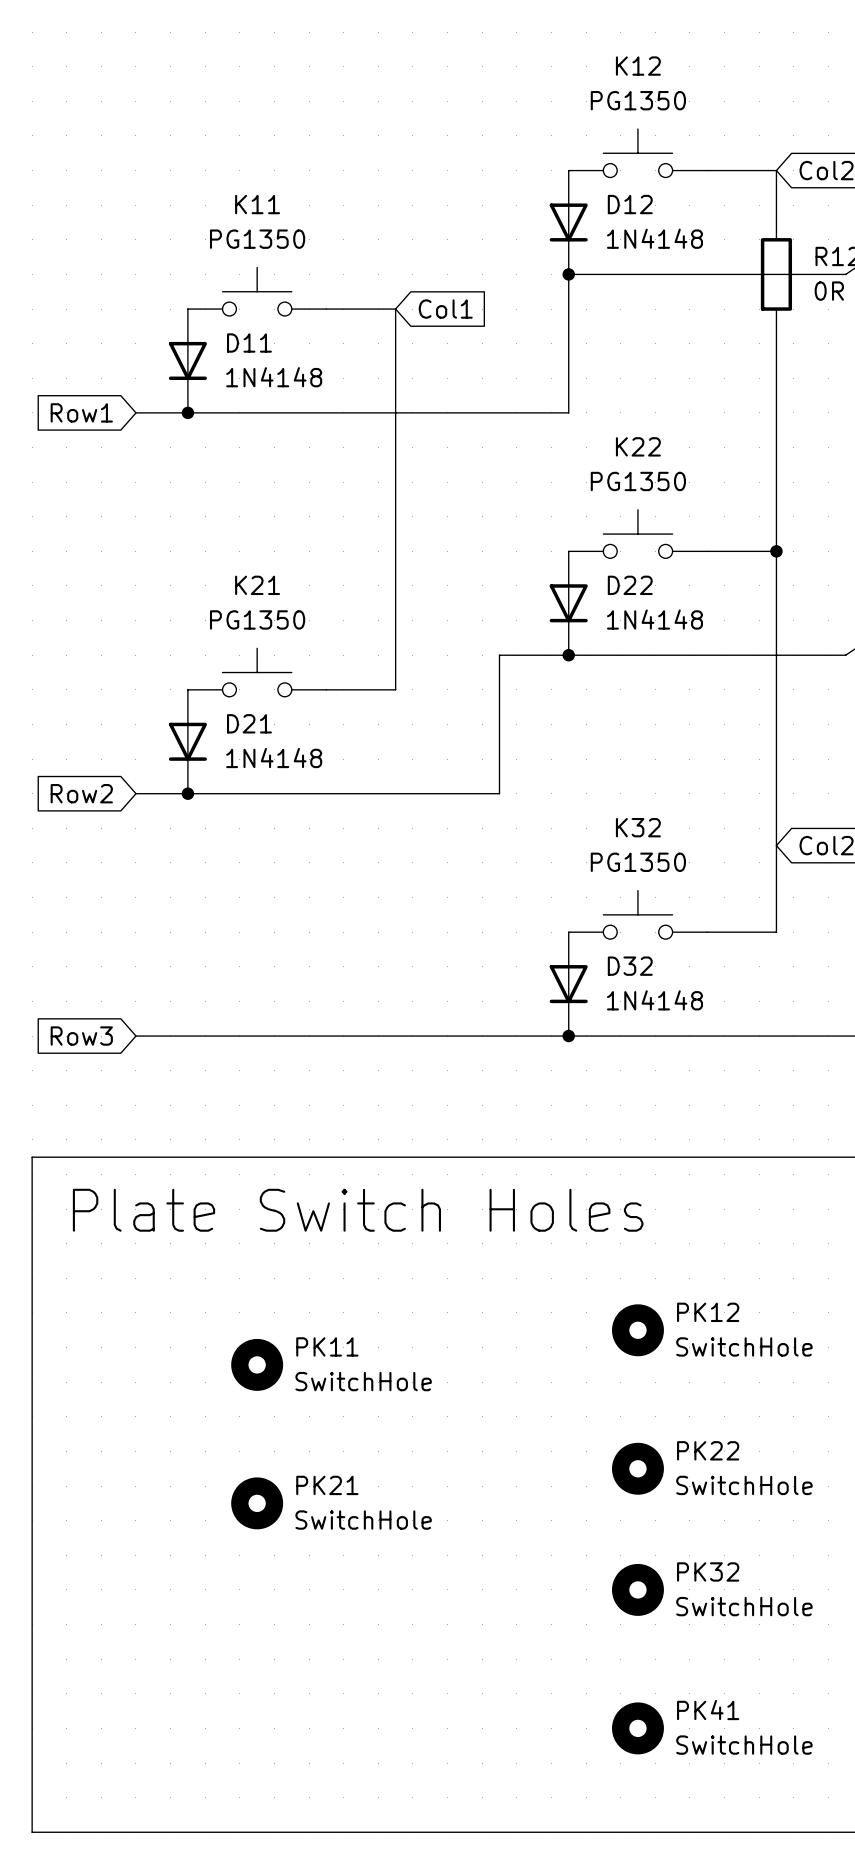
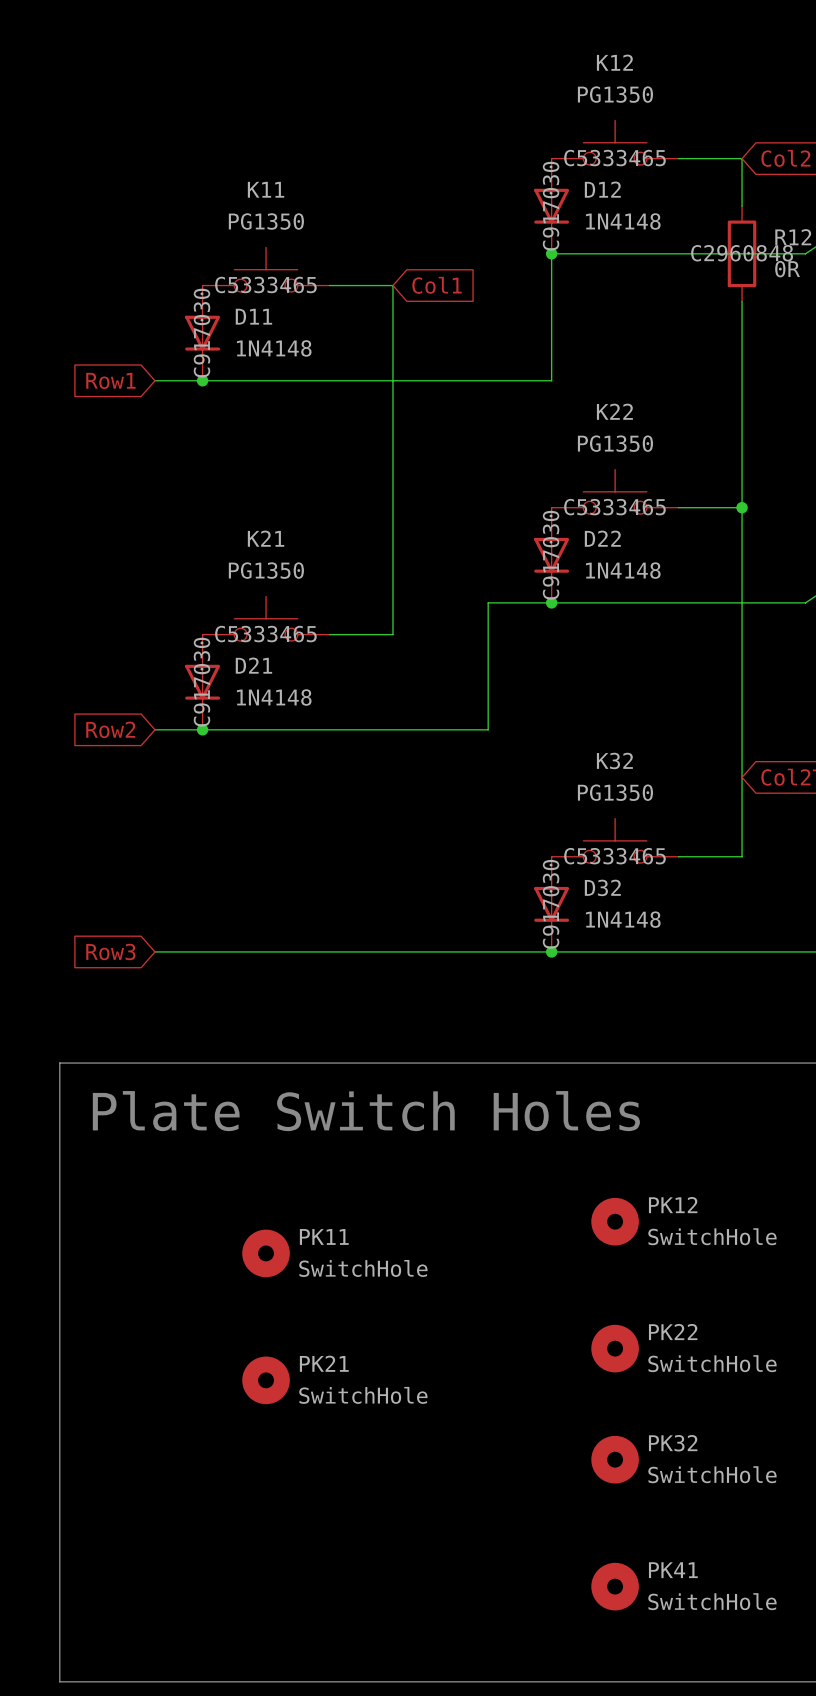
K12 text: none -> C5333465 (614, 158)
D12 text: none -> C917030 (551, 206)
R12 text: none -> C2960848 (742, 253)
K11 text: none -> C5333465 (265, 284)
D11 text: none -> C917030 (201, 333)
K22 text: none -> C5333465 (614, 507)
D22 text: none -> C917030 (551, 555)
K21 text: none -> C5333465 (265, 634)
D21 text: none -> C917030 (201, 682)
K32 text: none -> C5333465 (614, 856)
D32 text: none -> C917030 (551, 904)

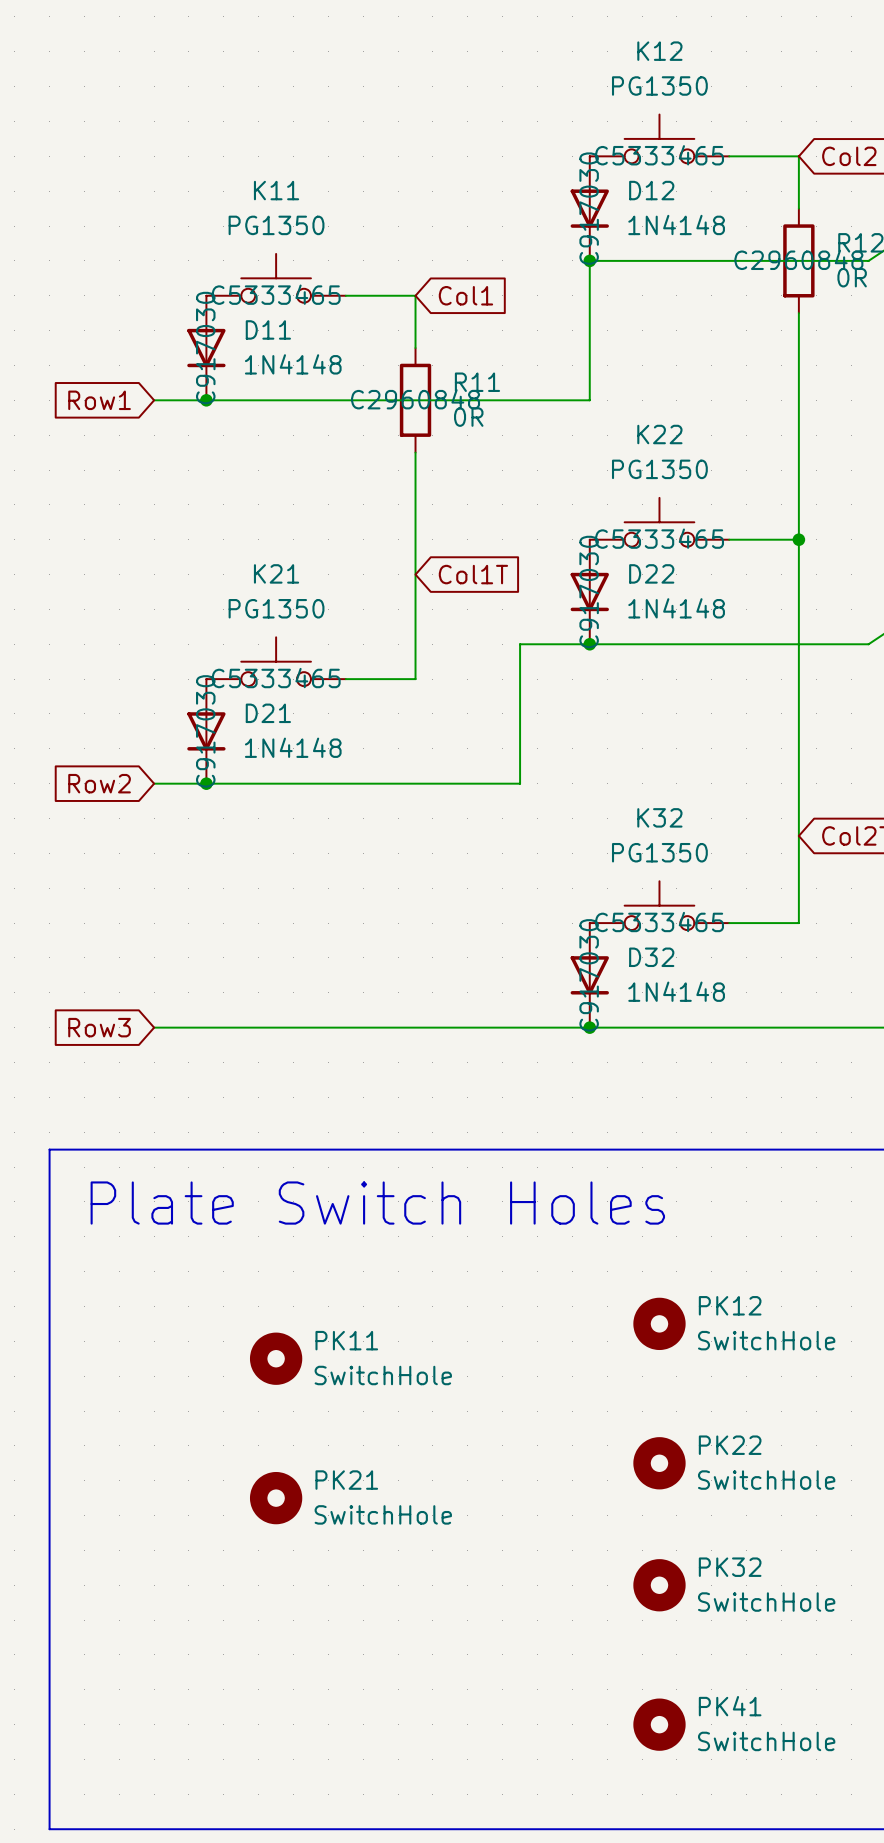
wire: (392, 333) (392, 428) -> none
R11: none -> 0R (415, 400)
global label: none -> Col1T (473, 574)

